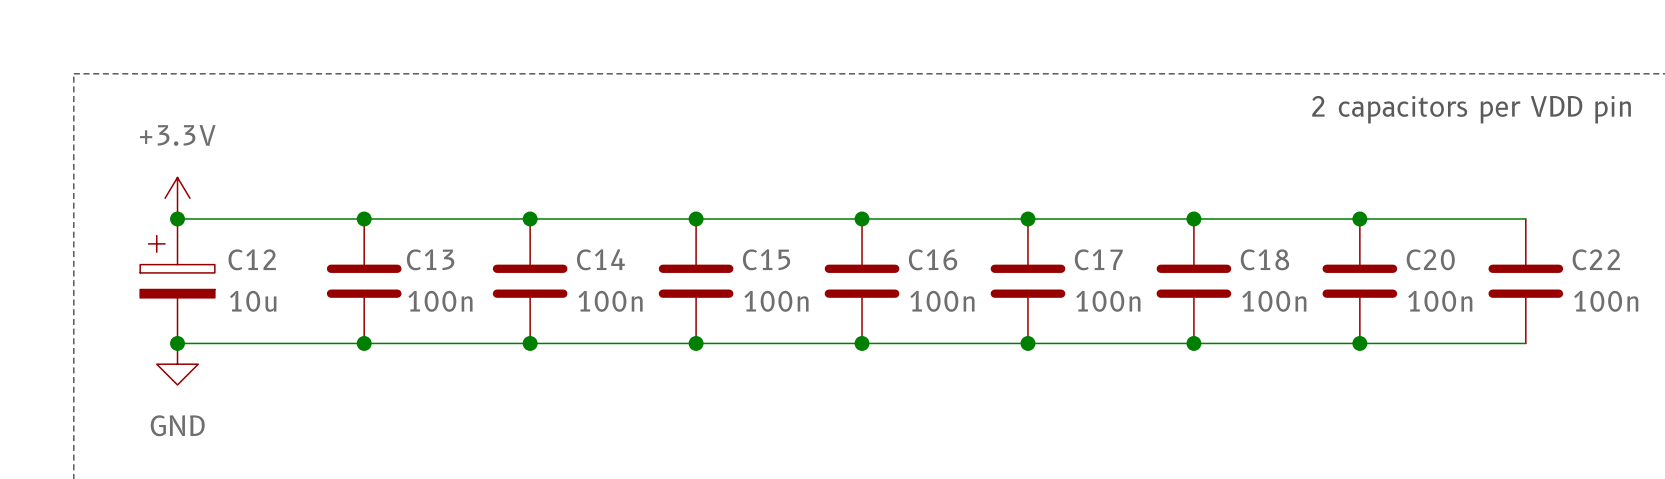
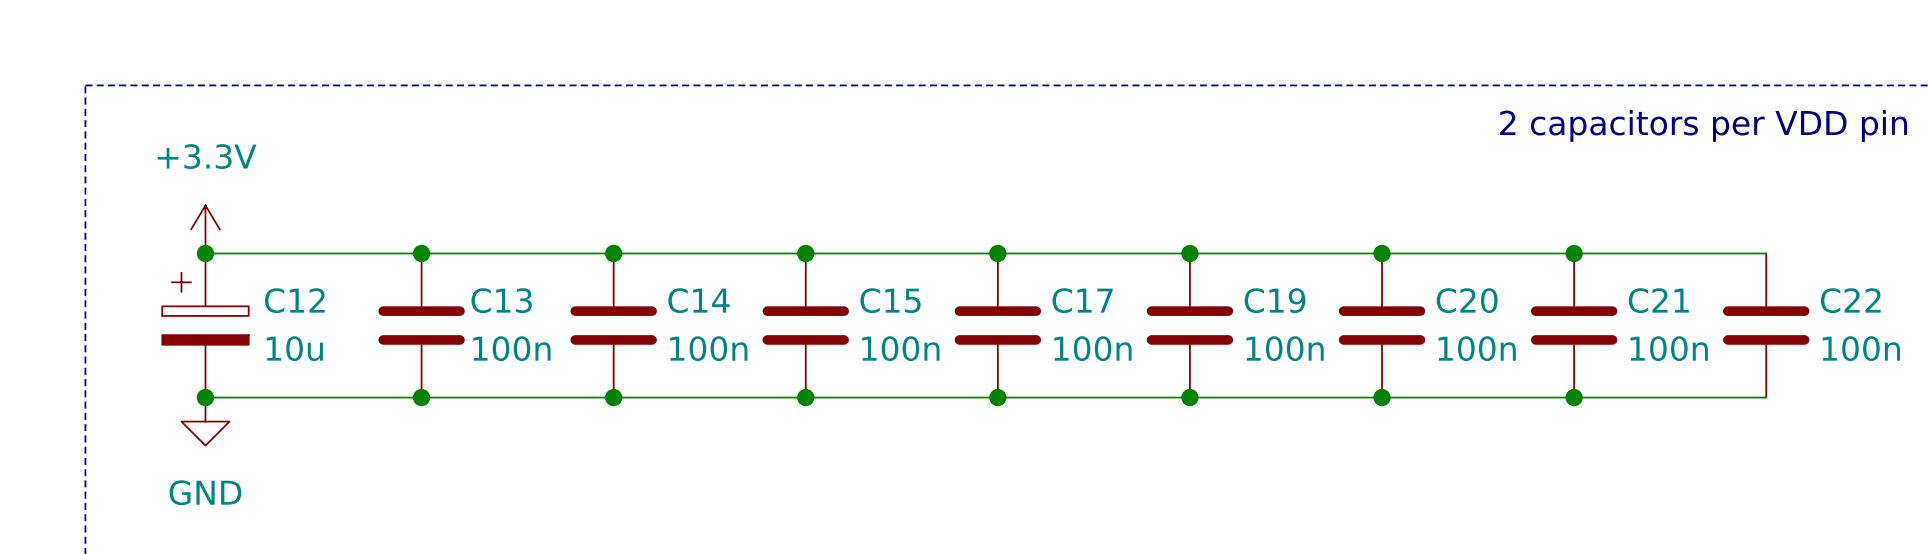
C16 name: C16 (933, 259) -> C17 (1082, 300)
C17 name: C17 (1098, 259) -> C19 (1274, 300)
C18 name: C18 (1264, 259) -> C20 (1467, 300)
C20 name: C20 (1430, 259) -> C21 (1658, 300)

